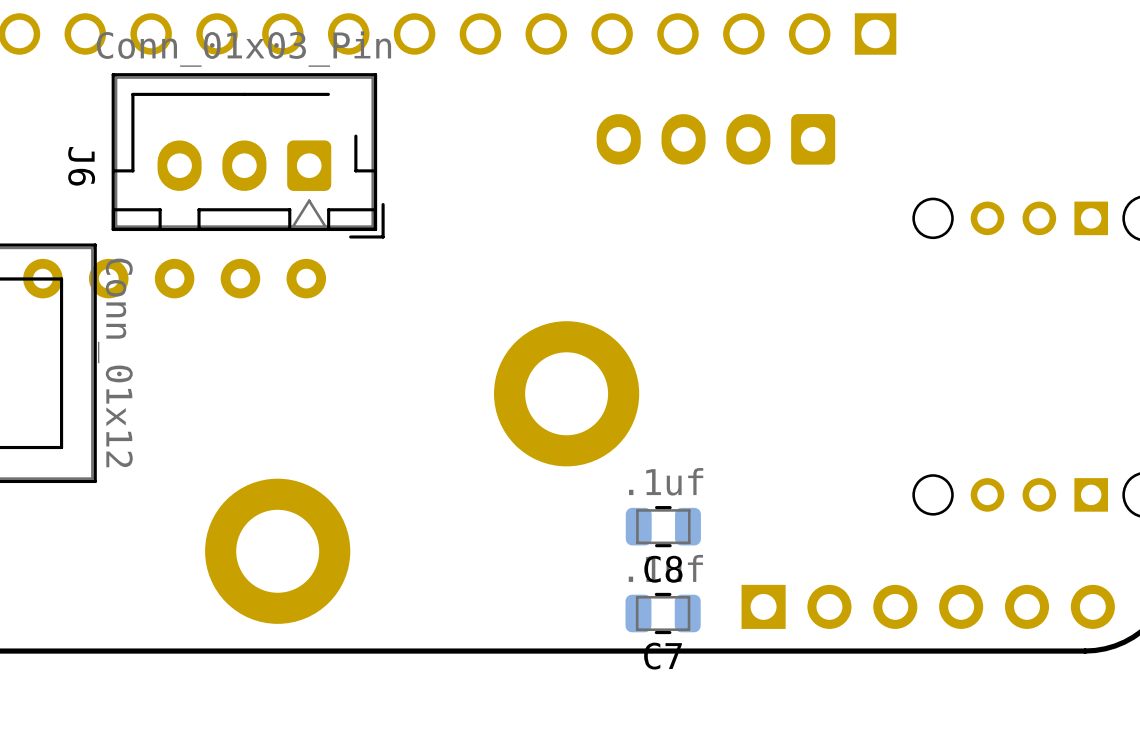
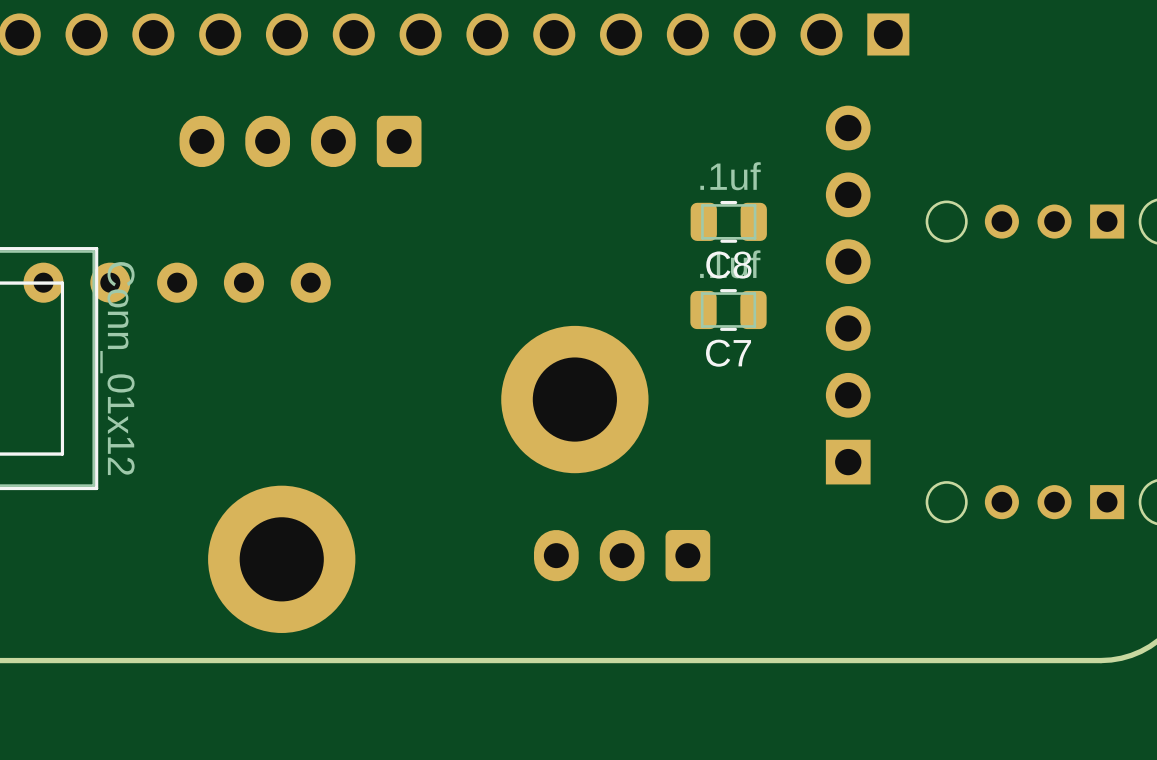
part position: (715, 139) -> (300, 141)
J6 side: bottom (248, 155) -> top (622, 555)
C8 position: (663, 526) -> (728, 221)
part rotation: 0° (928, 606) -> 90° counterclockwise (848, 295)
part position: (928, 606) -> (848, 295)
C7 position: (663, 613) -> (728, 310)

